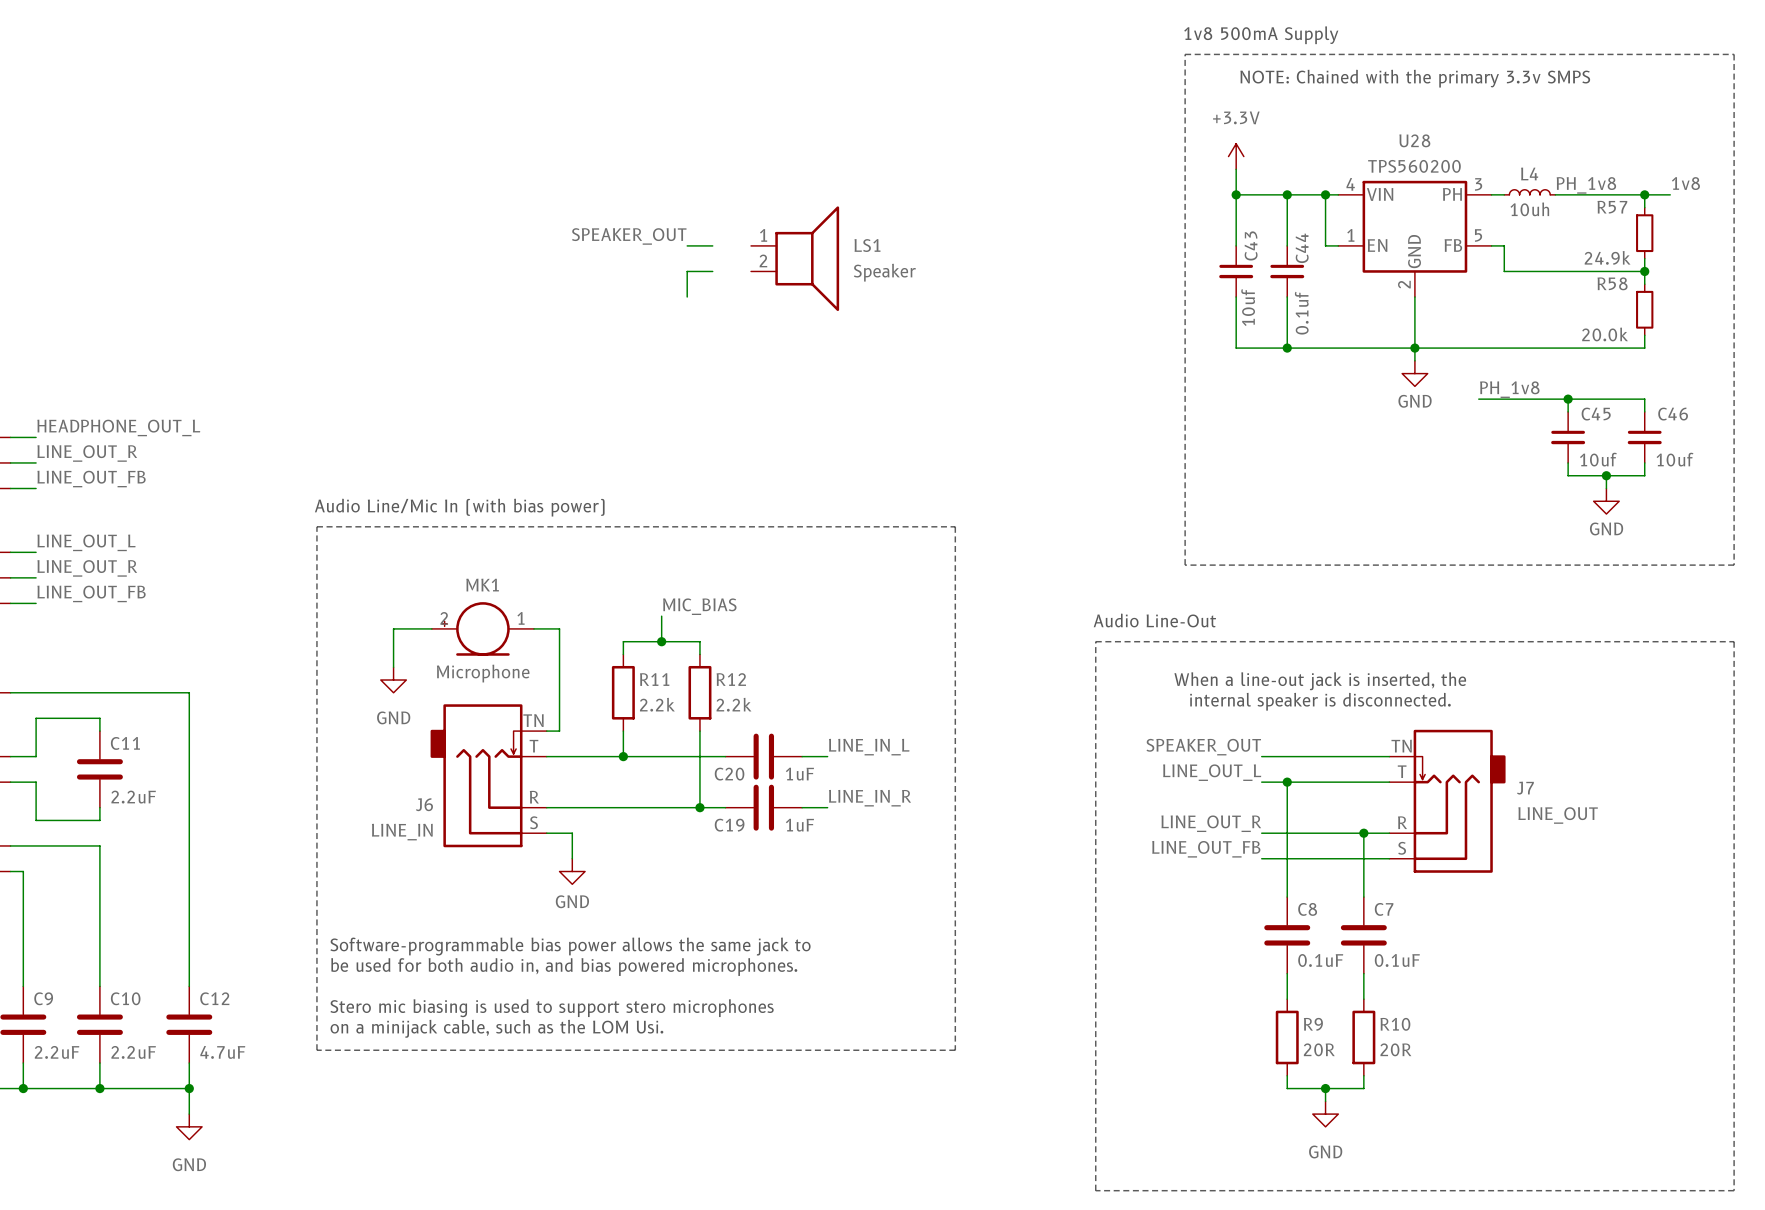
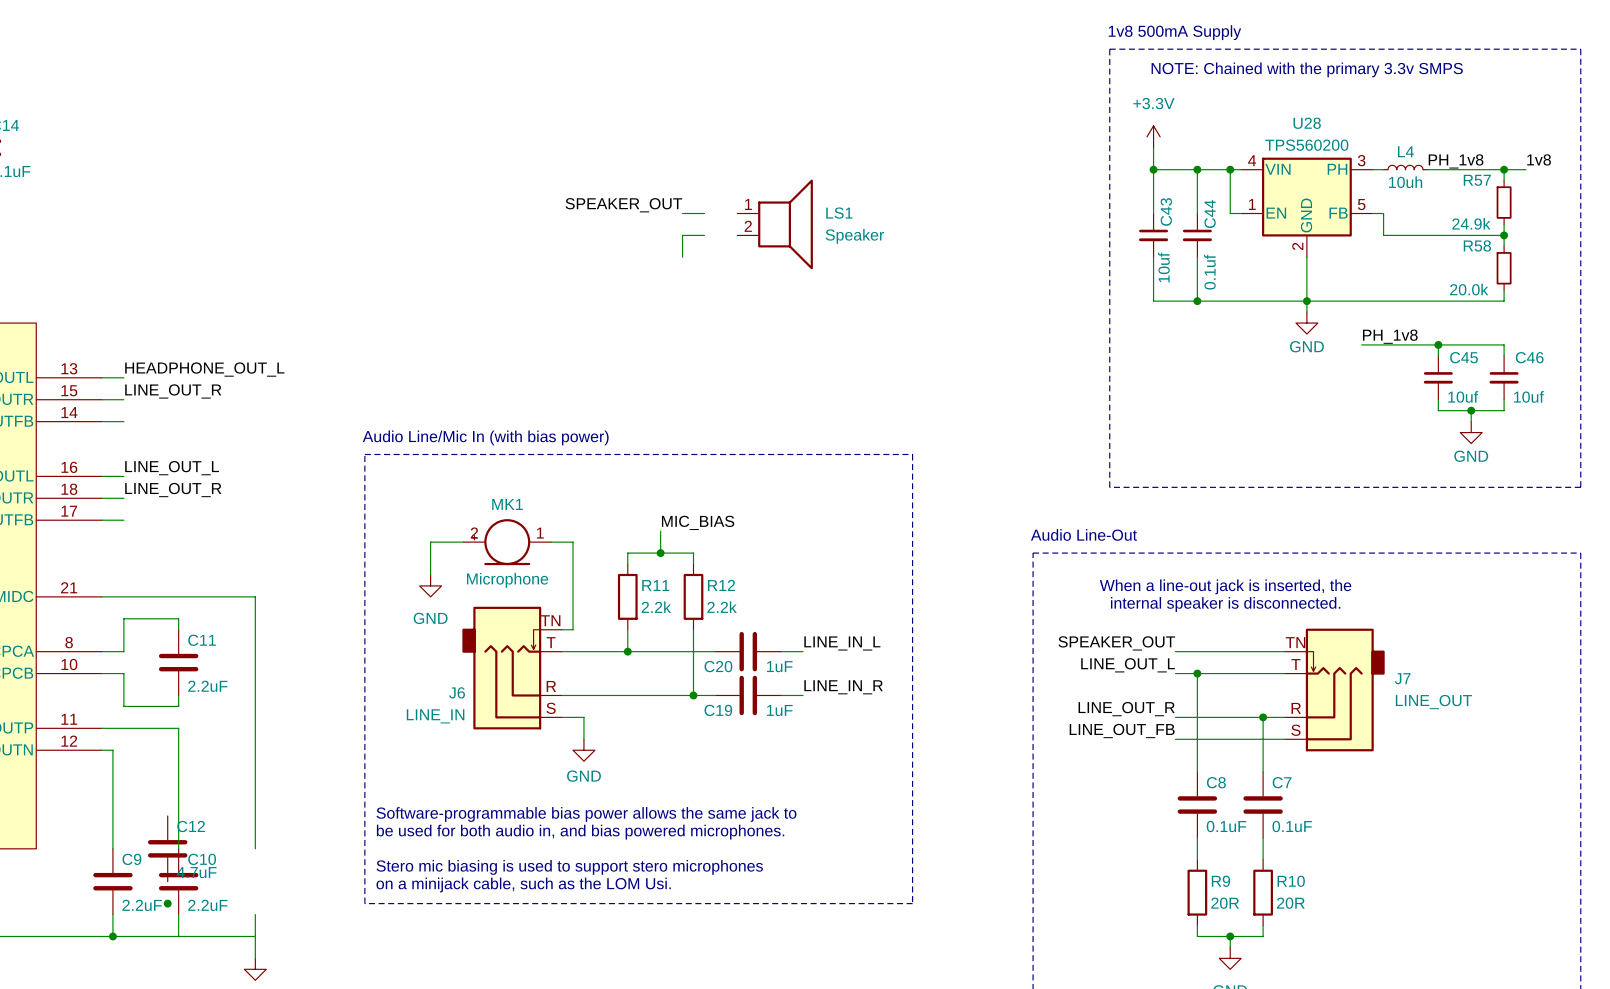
label: LINE_OUT_FB (91, 479) -> none
label: LINE_OUT_FB (91, 593) -> none
C12 position: (189, 1024) -> (167, 848)
junction position: (99, 1088) -> (167, 903)
junction: (189, 1088) -> none

